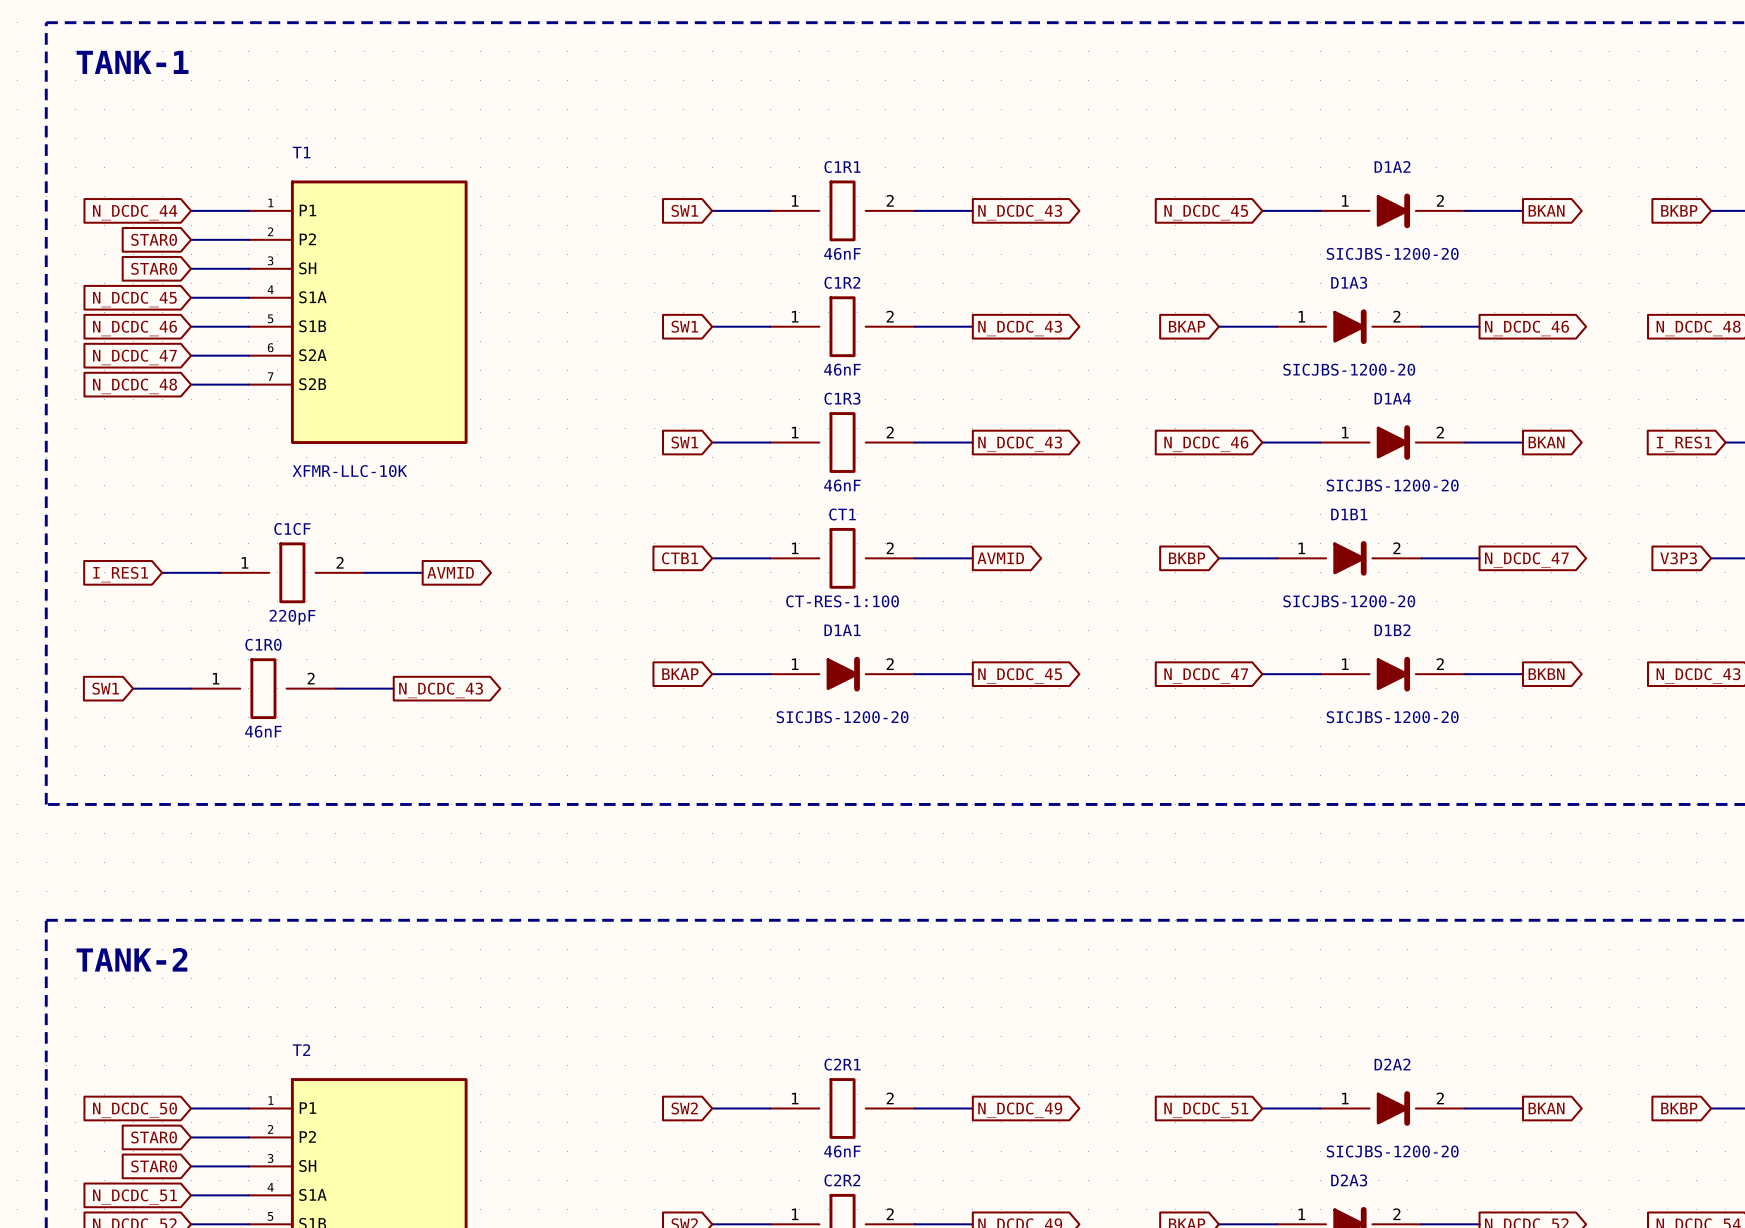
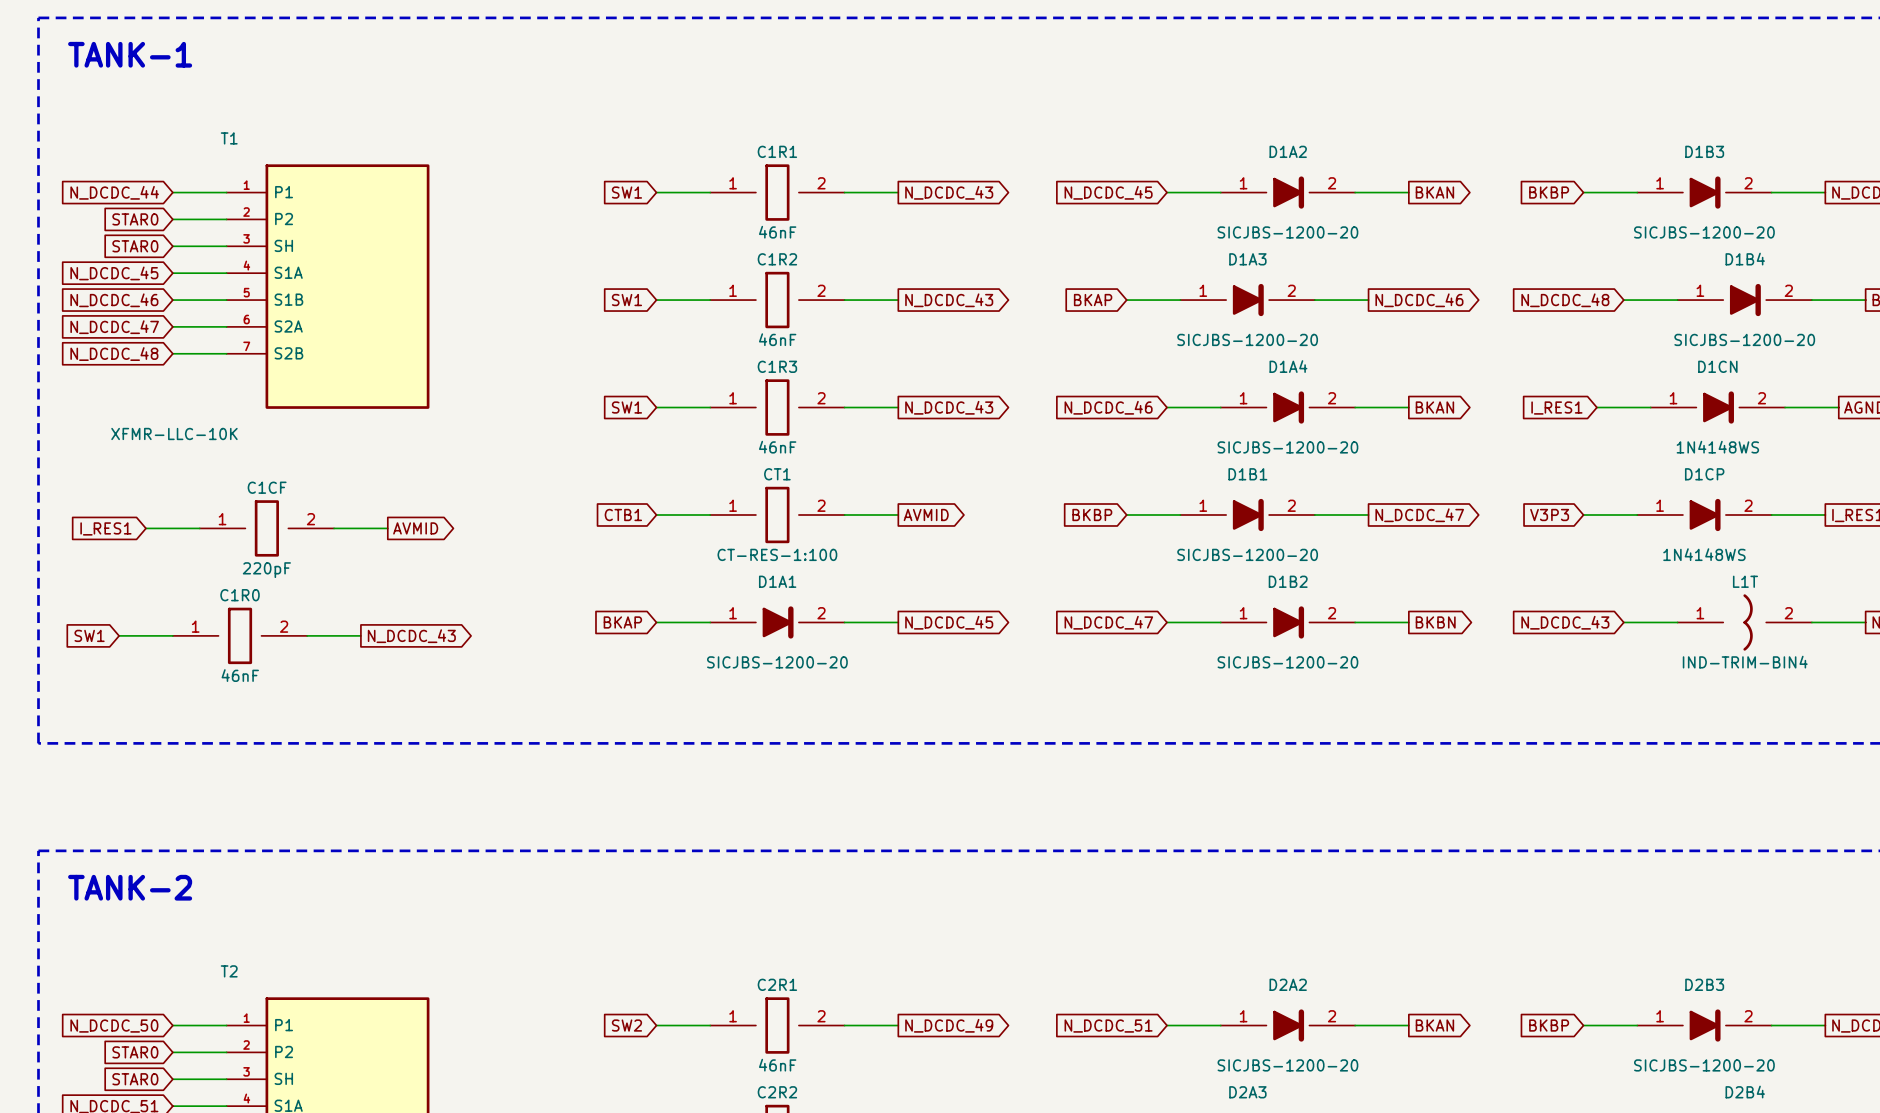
T1 name position: T1 (301, 152) -> T1 (229, 138)
T1 value position: XFMR-LLC-10K (349, 471) -> XFMR-LLC-10K (174, 433)
T2 name position: T2 (301, 1050) -> T2 (229, 971)

